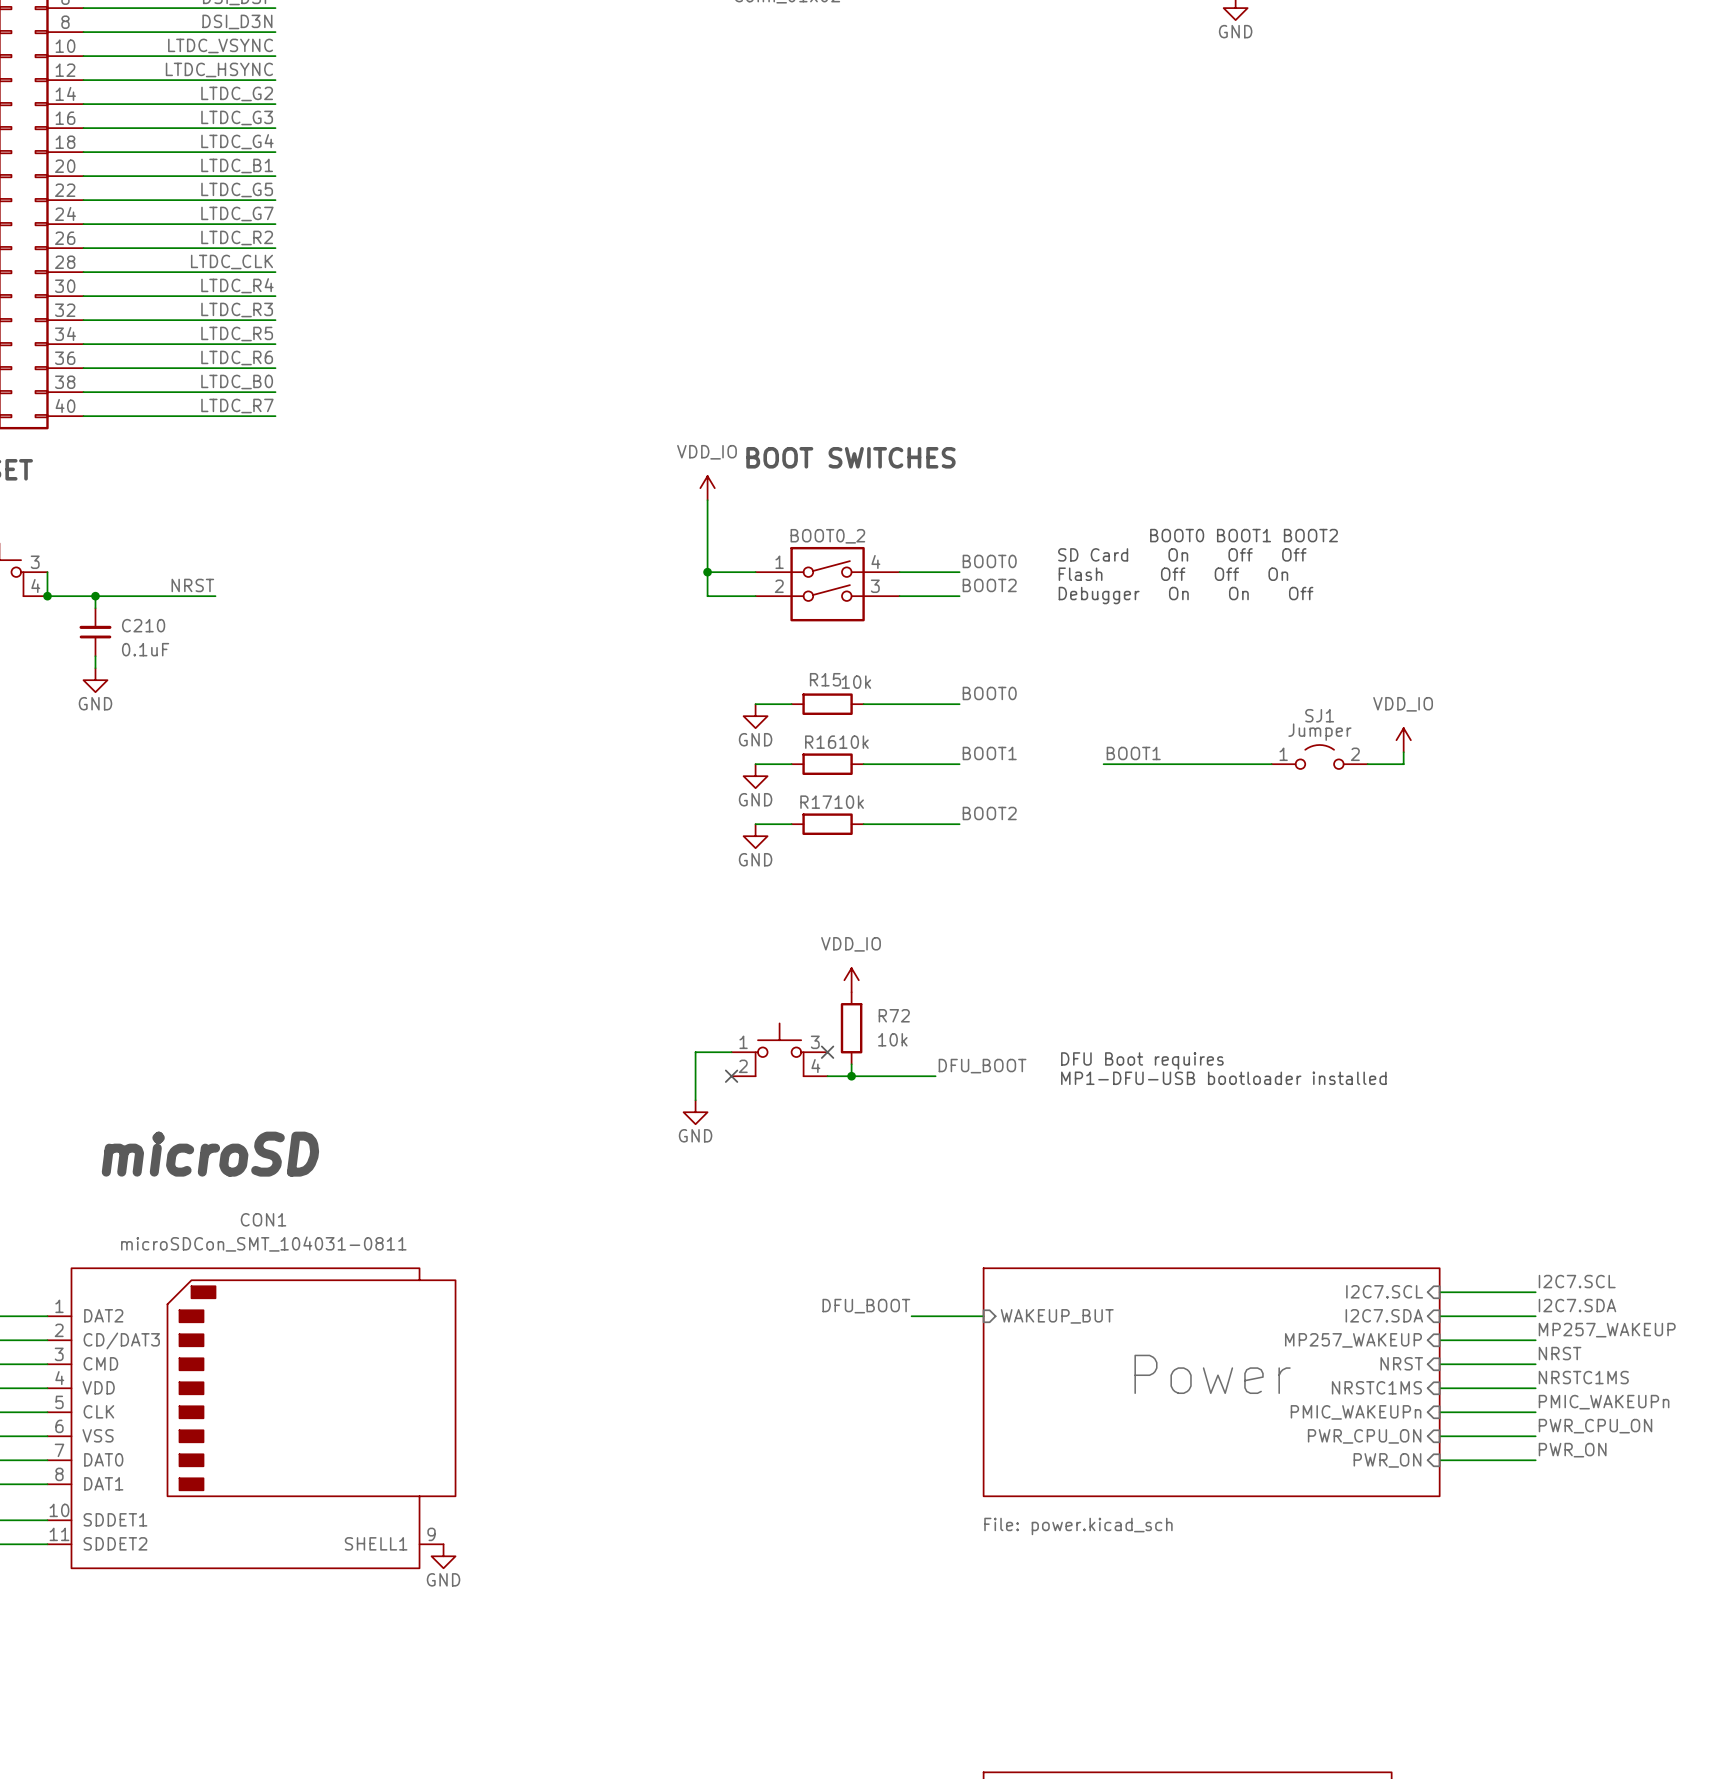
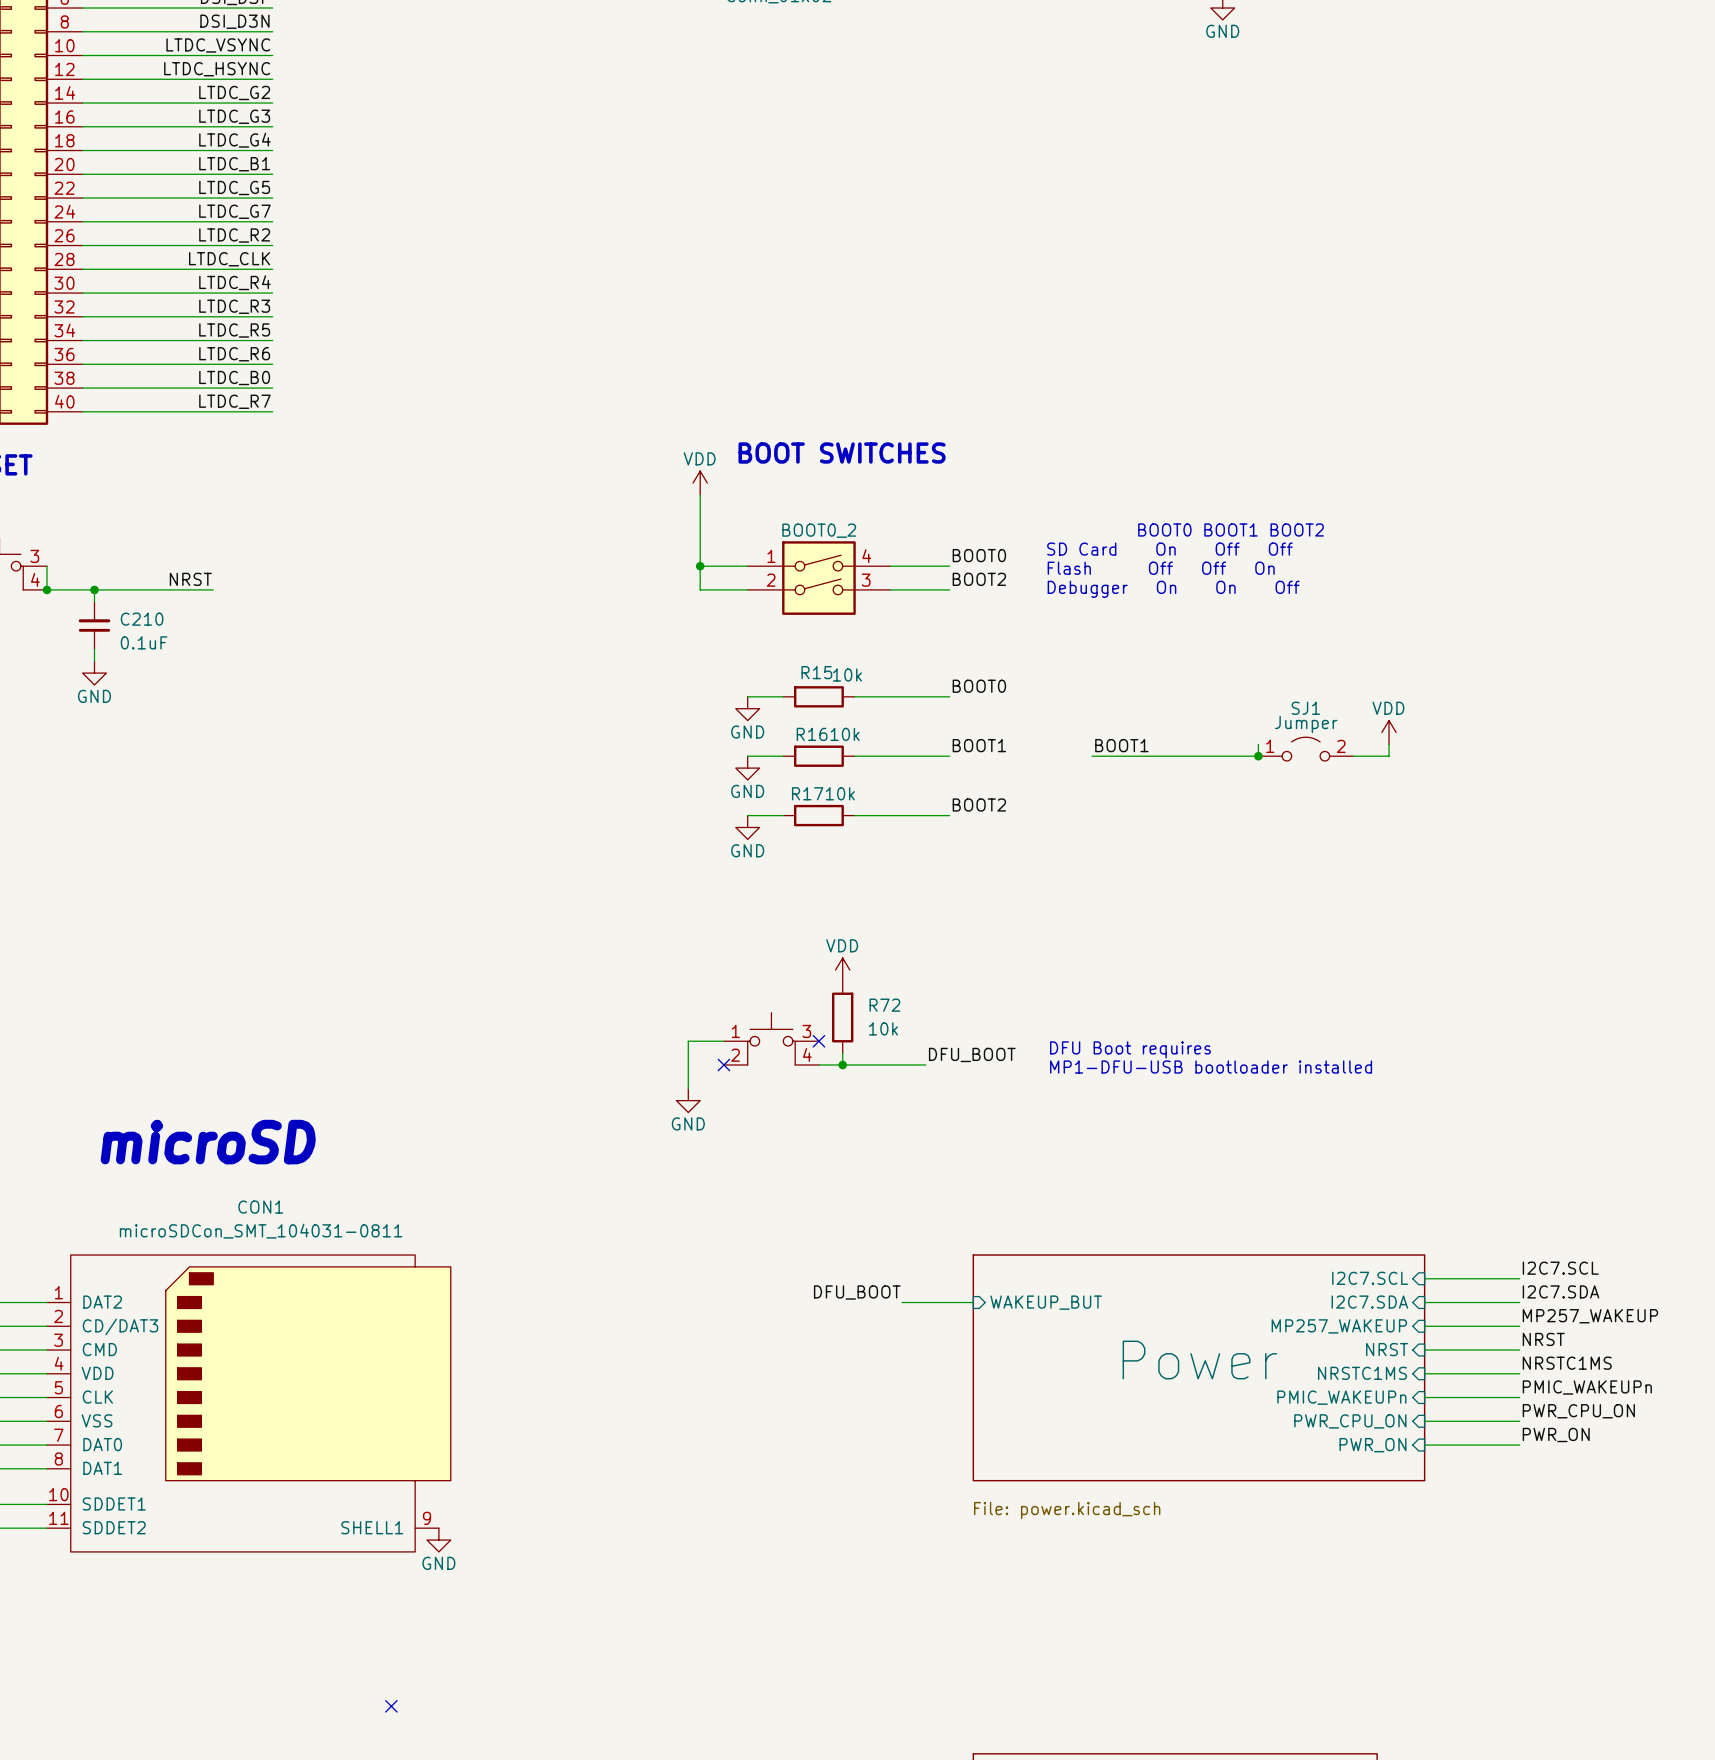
power symbol: VDD_IO (707, 488) -> VDD (700, 483)
power symbol: VDD_IO (1403, 740) -> VDD (1389, 732)
wire: none -> (1258, 744) (1258, 756)
junction: none -> (1258, 756)
power symbol: VDD_IO (851, 980) -> VDD (842, 969)
no-connect mark: none -> (391, 1706)

